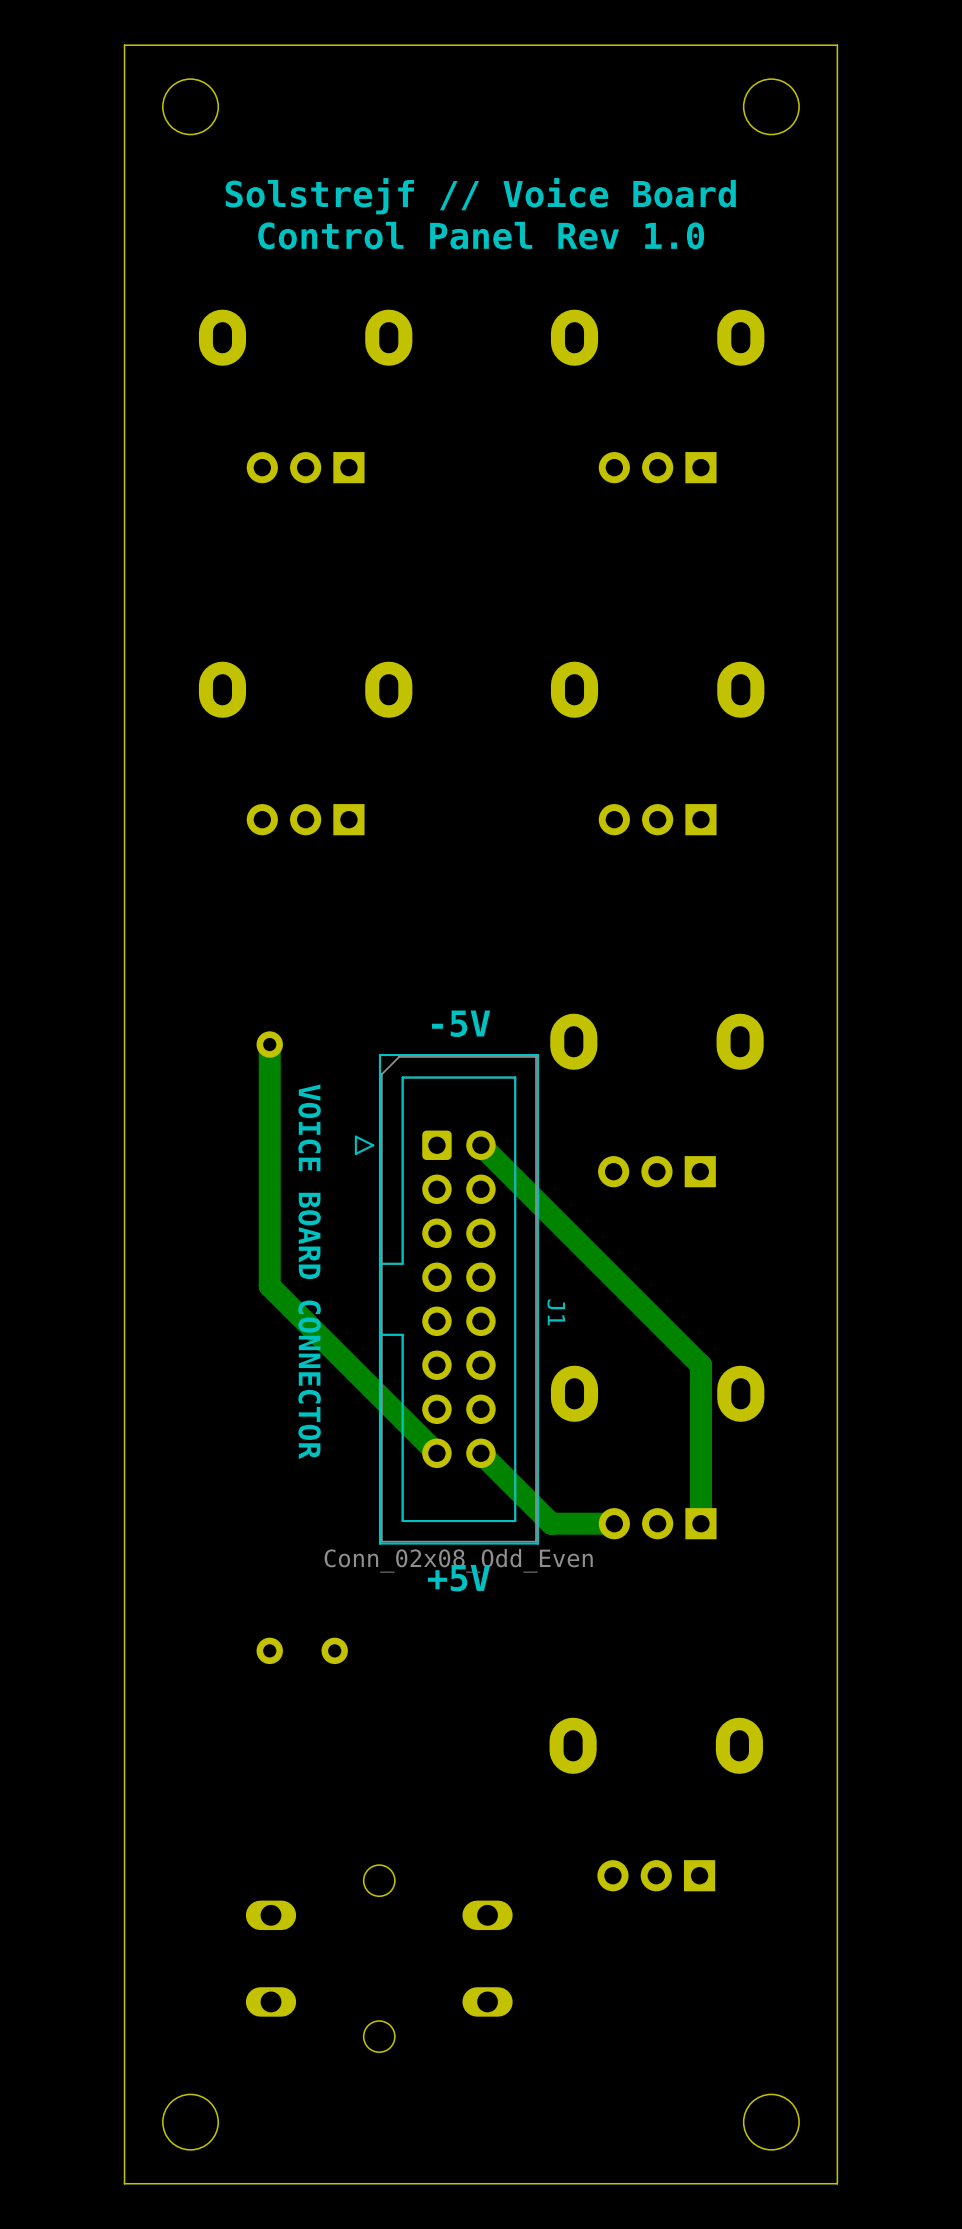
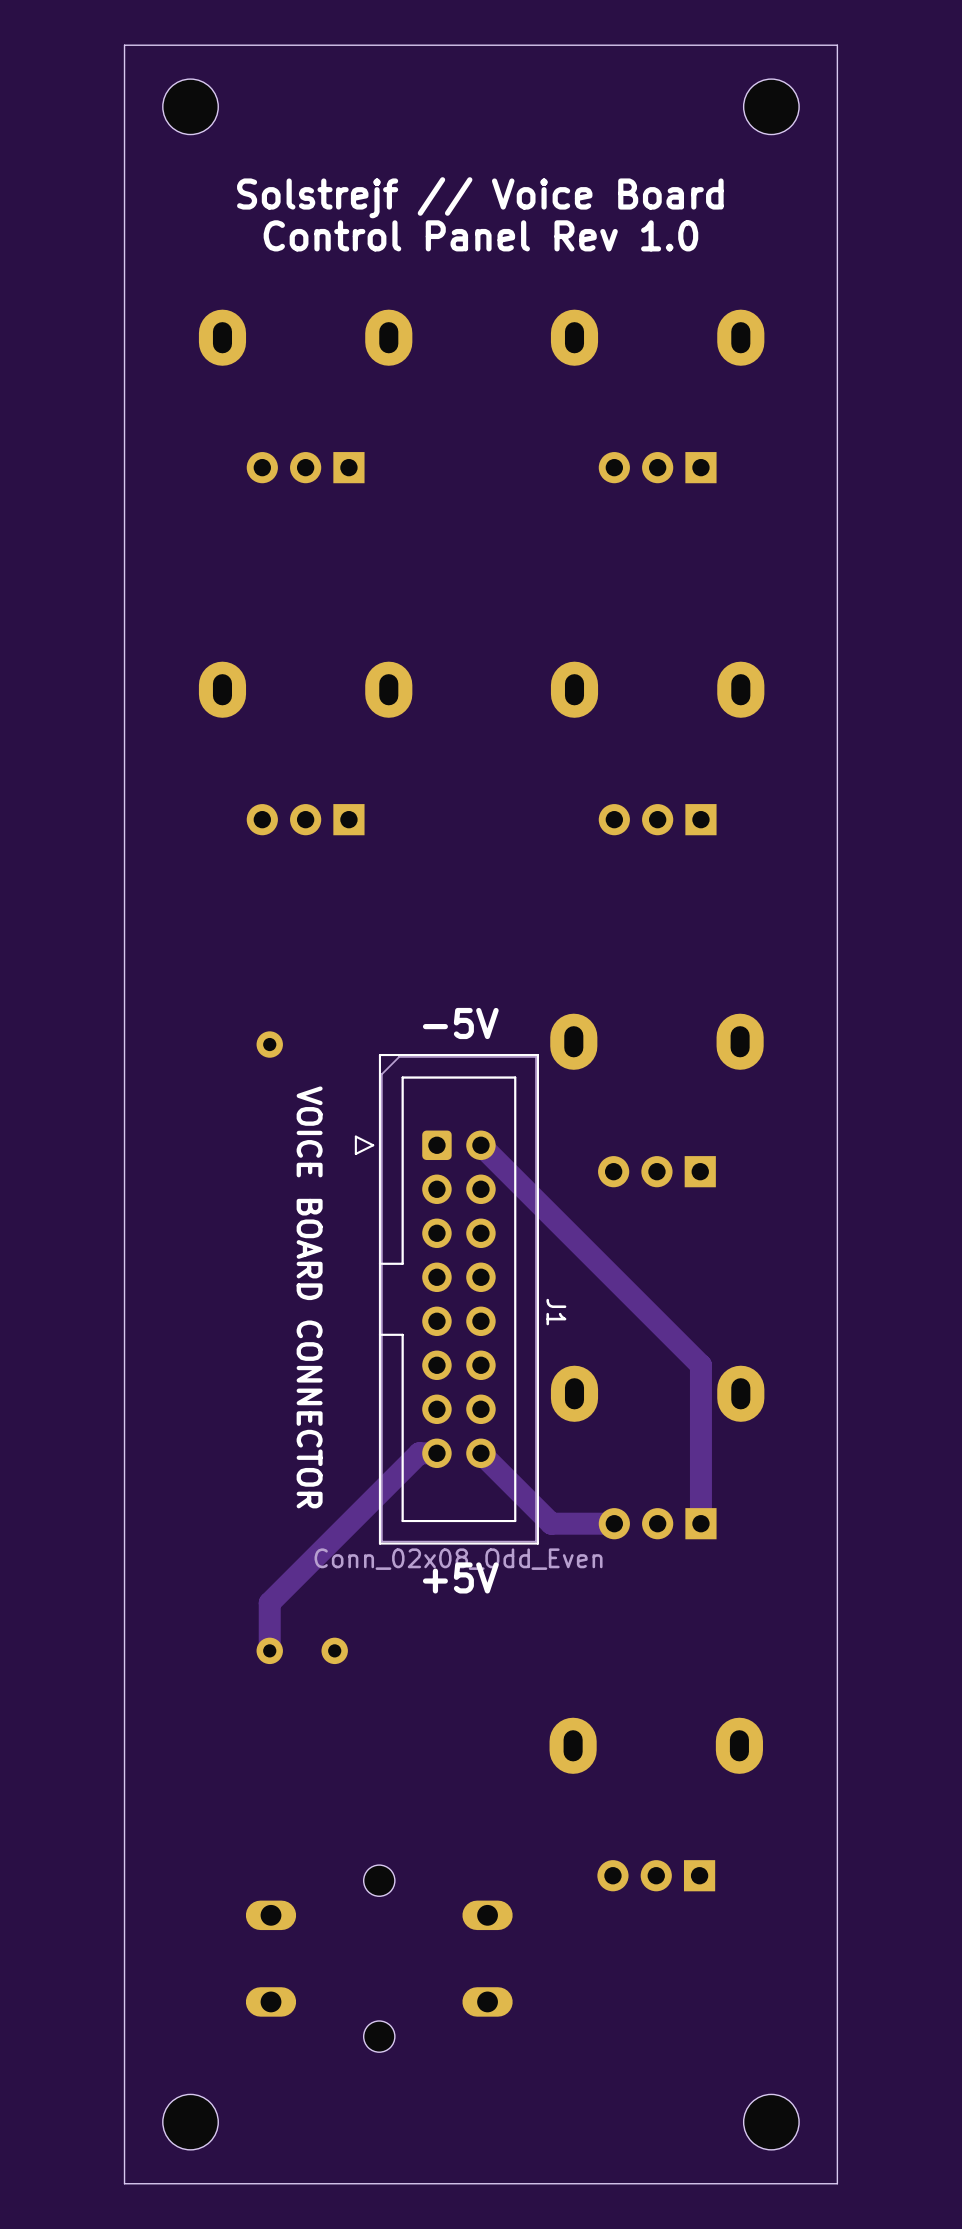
track: (269, 1044) (269, 1286) (436, 1453) -> (269, 1650) (269, 1602) (419, 1453) (436, 1453)

